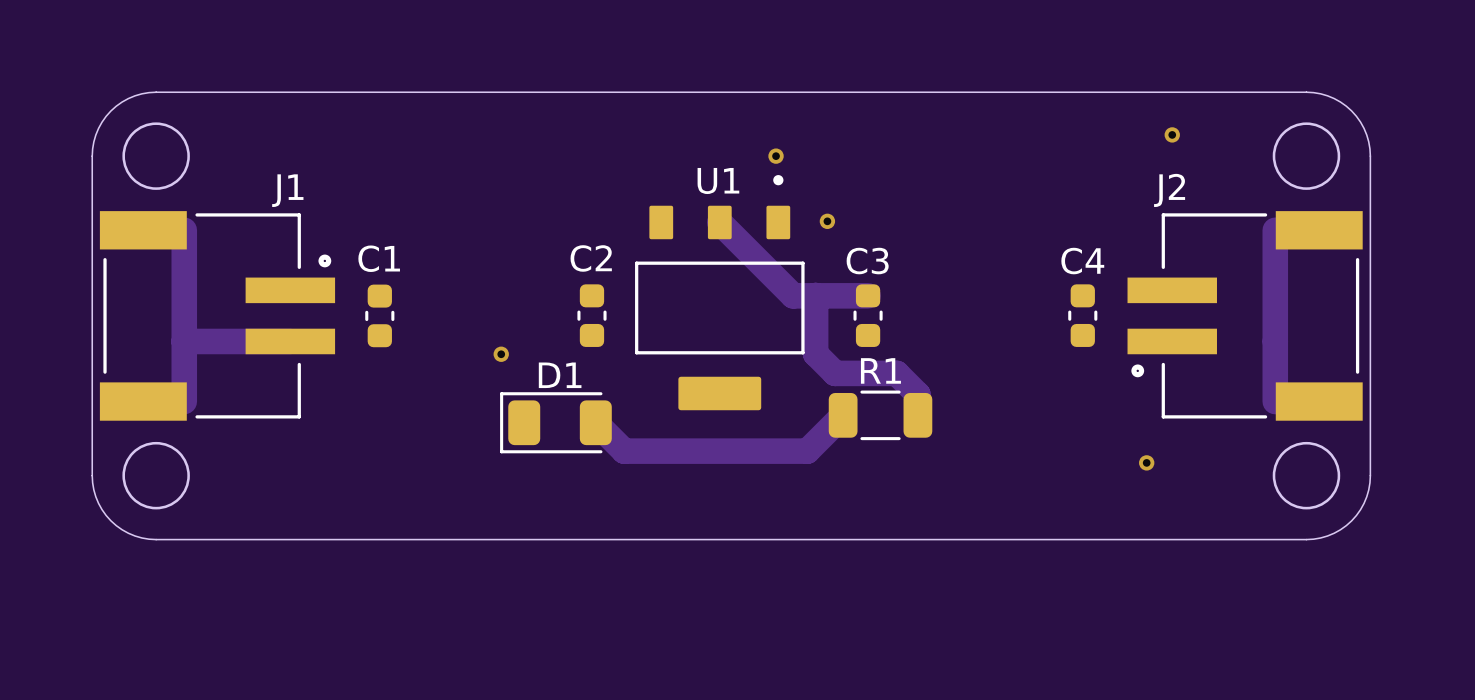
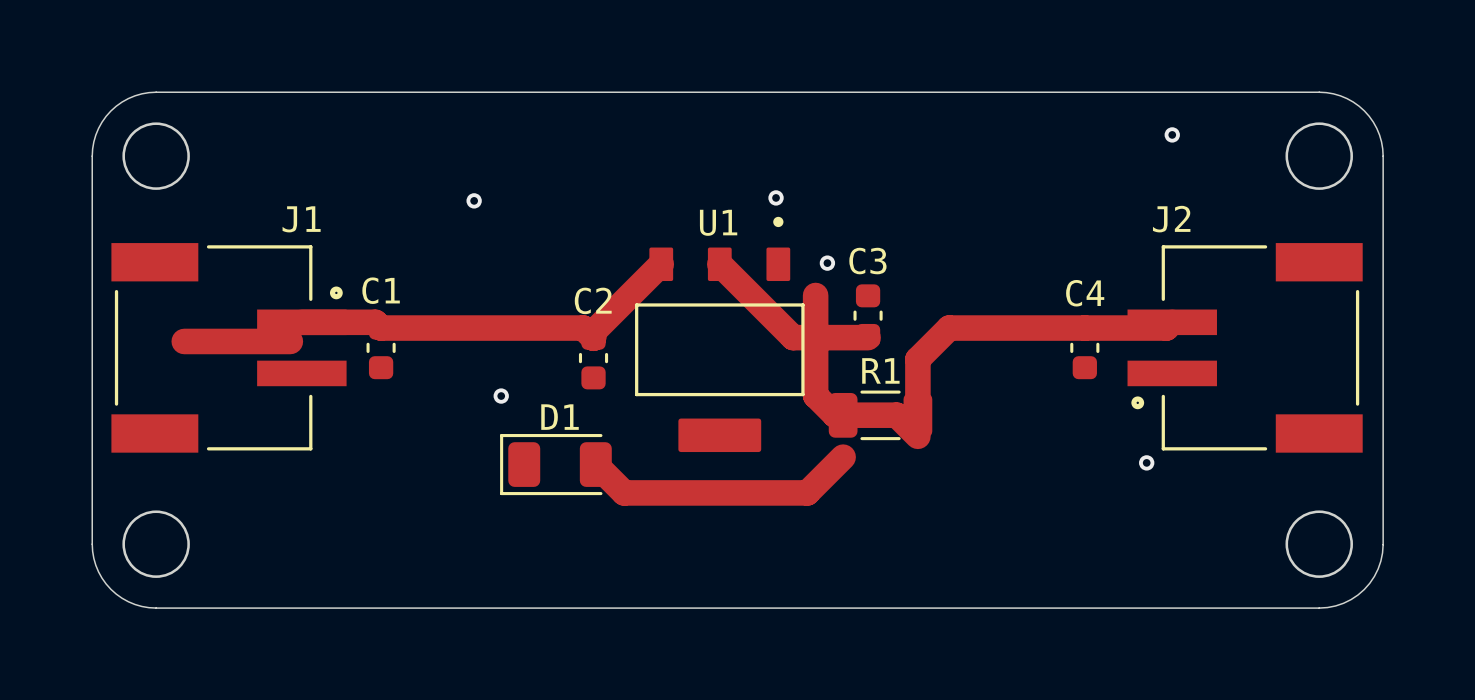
board edge: (1306, 92) (1320, 93) (1334, 98) (1351, 110) (1360, 122) (1366, 135) (1370, 156) (1369, 482) (1366, 496) (1356, 515) (1346, 525) (1327, 535) (1306, 539) (156, 539) (135, 535) (122, 529) (110, 520) (98, 503) (93, 489) (92, 475) -> (1306, 92) (1333, 93) (1346, 98) (1359, 106) (1373, 122) (1379, 135) (1382, 148) (1382, 552) (1378, 568) (1364, 589) (1351, 599) (1335, 605) (1319, 608) (148, 607) (128, 601) (116, 594) (106, 584) (98, 571) (92, 551) (92, 475)
via: (776, 156) -> none
round board edge position: (1306, 156) -> (1319, 156)
via: none -> (776, 197)
via: none -> (474, 200)
via: (827, 221) -> none
track: (719, 222) (793, 295) (868, 295) -> (719, 264) (793, 337) (868, 337)
track: (184, 230) (184, 401) -> none
track: (1275, 230) (1275, 401) -> none
via: none -> (827, 263)
track: none -> (661, 264) (593, 332) (593, 338) (583, 328) (381, 328) (375, 322) (301, 322)
U1 position: (719, 292) -> (719, 334)
J1 position: (217, 315) -> (228, 347)
C1 position: (379, 315) -> (381, 347)
C2 position: (591, 315) -> (593, 358)
C4 position: (1082, 315) -> (1084, 347)
J2 position: (1245, 315) -> (1245, 347)
track: none -> (1172, 322) (1166, 328) (949, 328) (917, 359) (917, 394)
track: (815, 353) (835, 373) (896, 373) (917, 394) -> (815, 353) (815, 395) (835, 415) (896, 415) (917, 436)
via position: (501, 354) -> (501, 396)
track: (843, 415) (807, 451) (624, 451) (595, 422) -> (843, 457) (807, 492) (624, 492) (595, 464)
D1 position: (555, 422) -> (555, 464)
round board edge position: (156, 475) -> (156, 544)
round board edge position: (1306, 475) -> (1319, 544)

